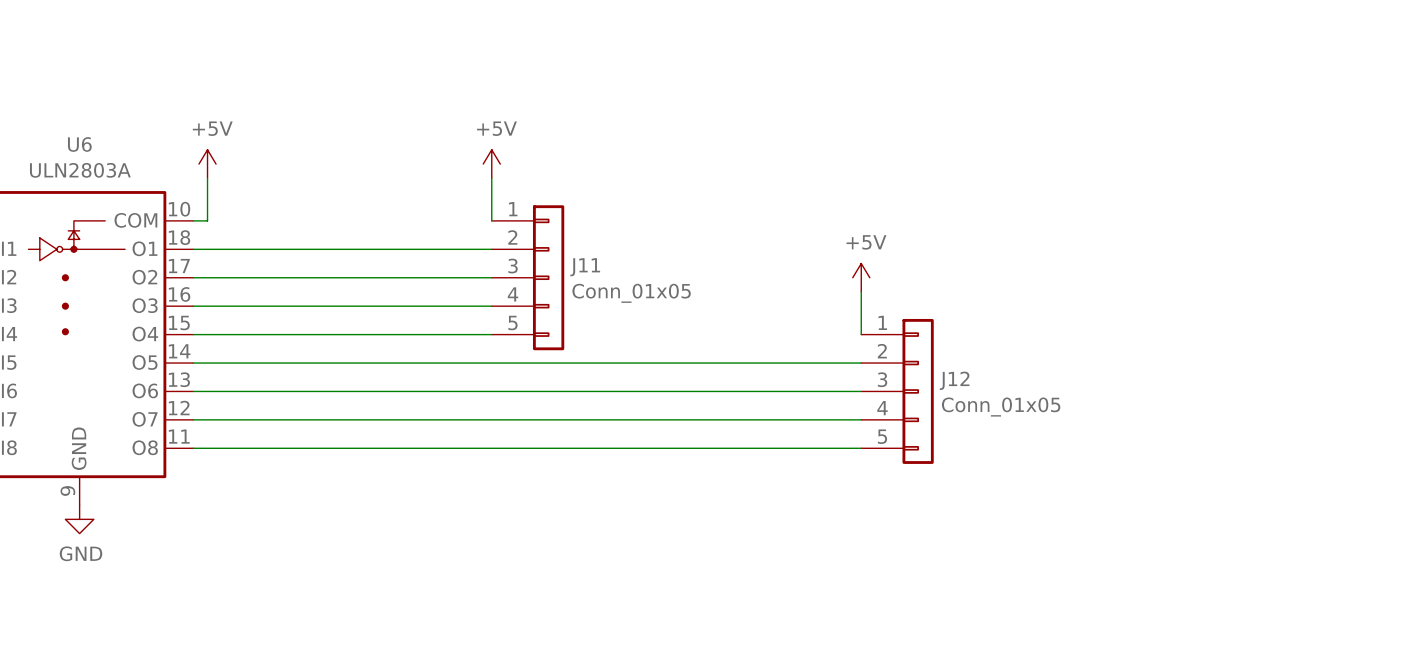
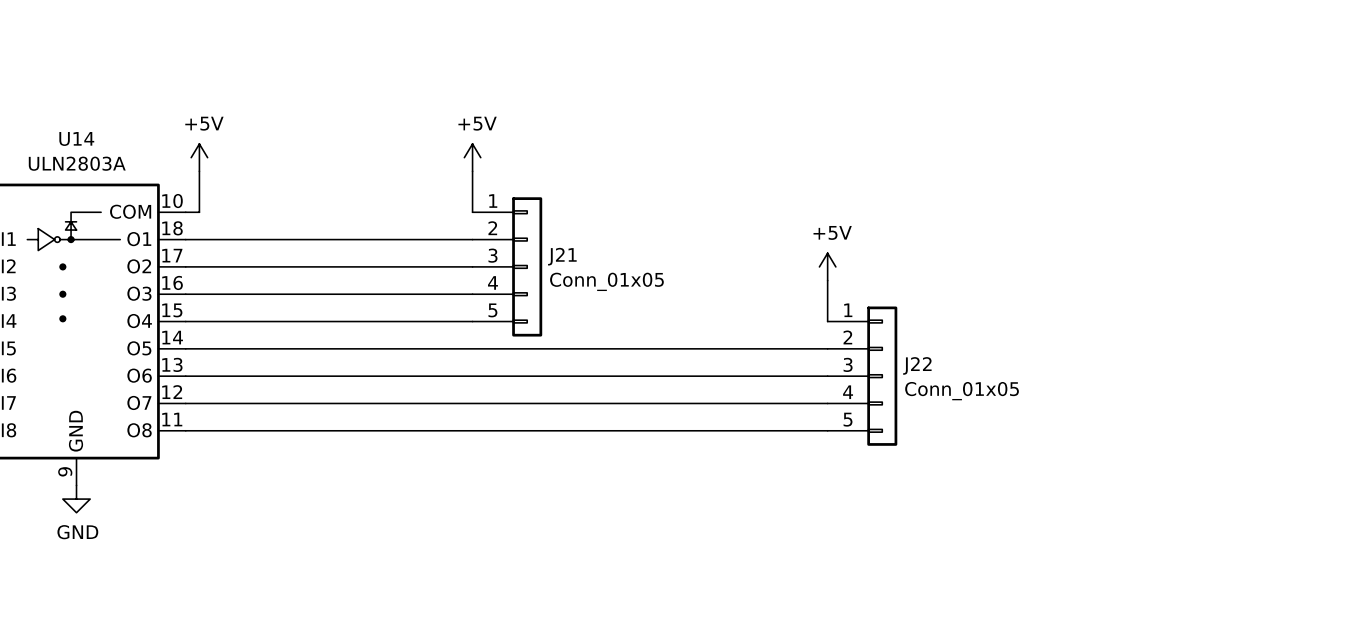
U6 name: U6 (79, 144) -> U14 (76, 138)
J11 name: J11 (585, 267) -> J21 (562, 256)
J12 name: J12 (954, 380) -> J22 (917, 365)

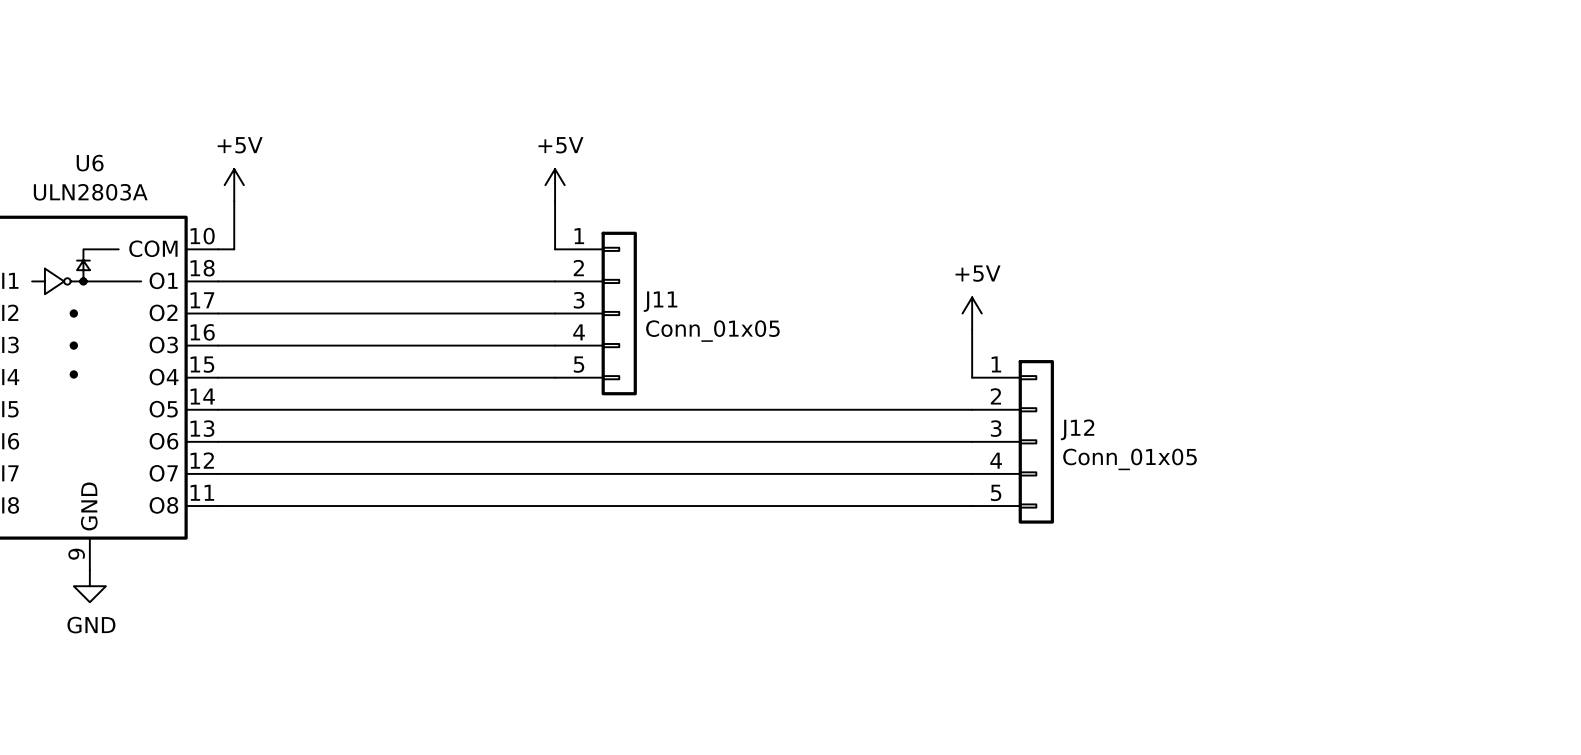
U14 name: U14 (76, 138) -> U6 (90, 163)
J21 name: J21 (562, 256) -> J11 (660, 301)
J22 name: J22 (917, 365) -> J12 (1077, 429)

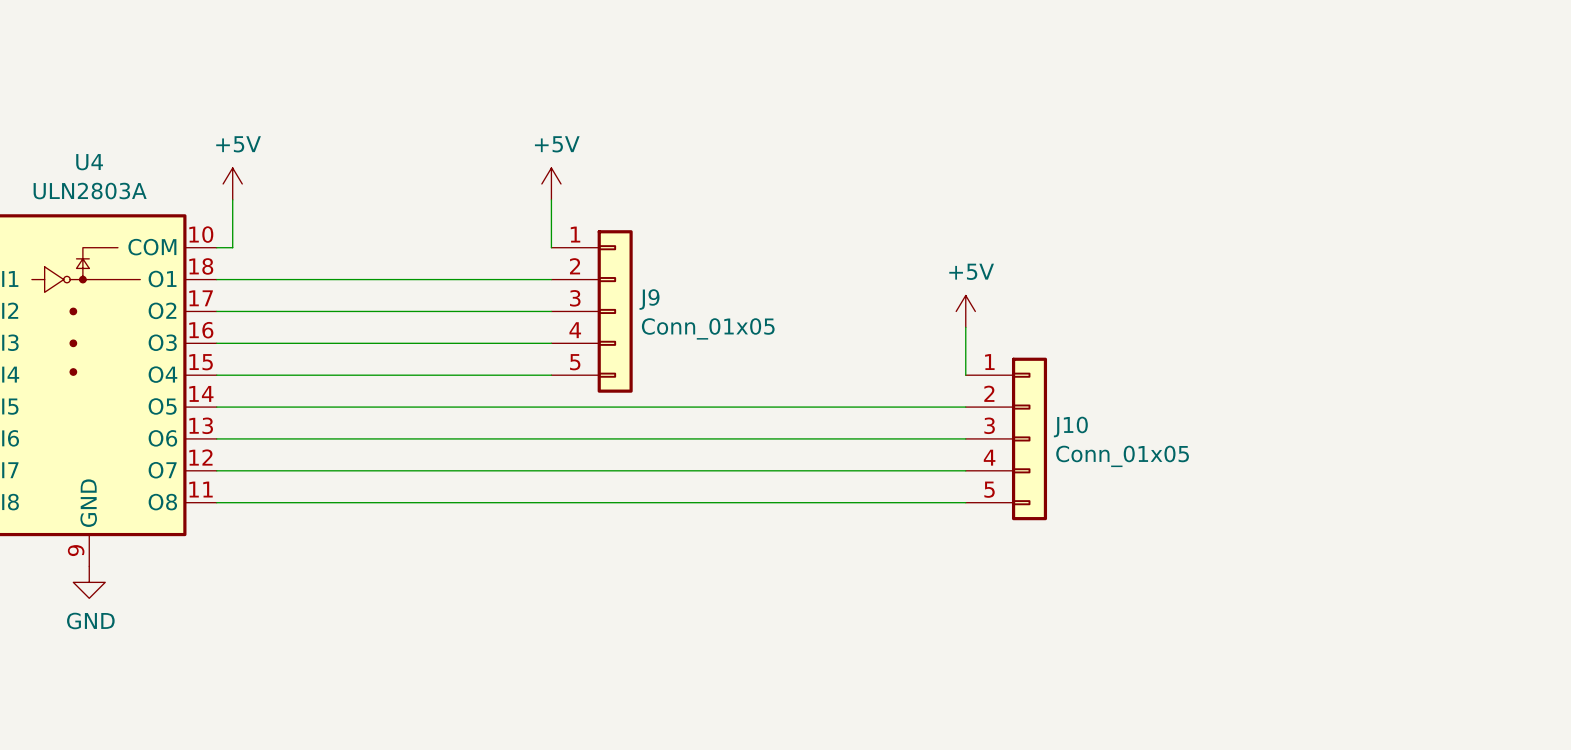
U6 name: U6 (90, 163) -> U4 (89, 162)
J11 name: J11 (660, 301) -> J9 (649, 299)
J12 name: J12 (1077, 429) -> J10 (1070, 427)

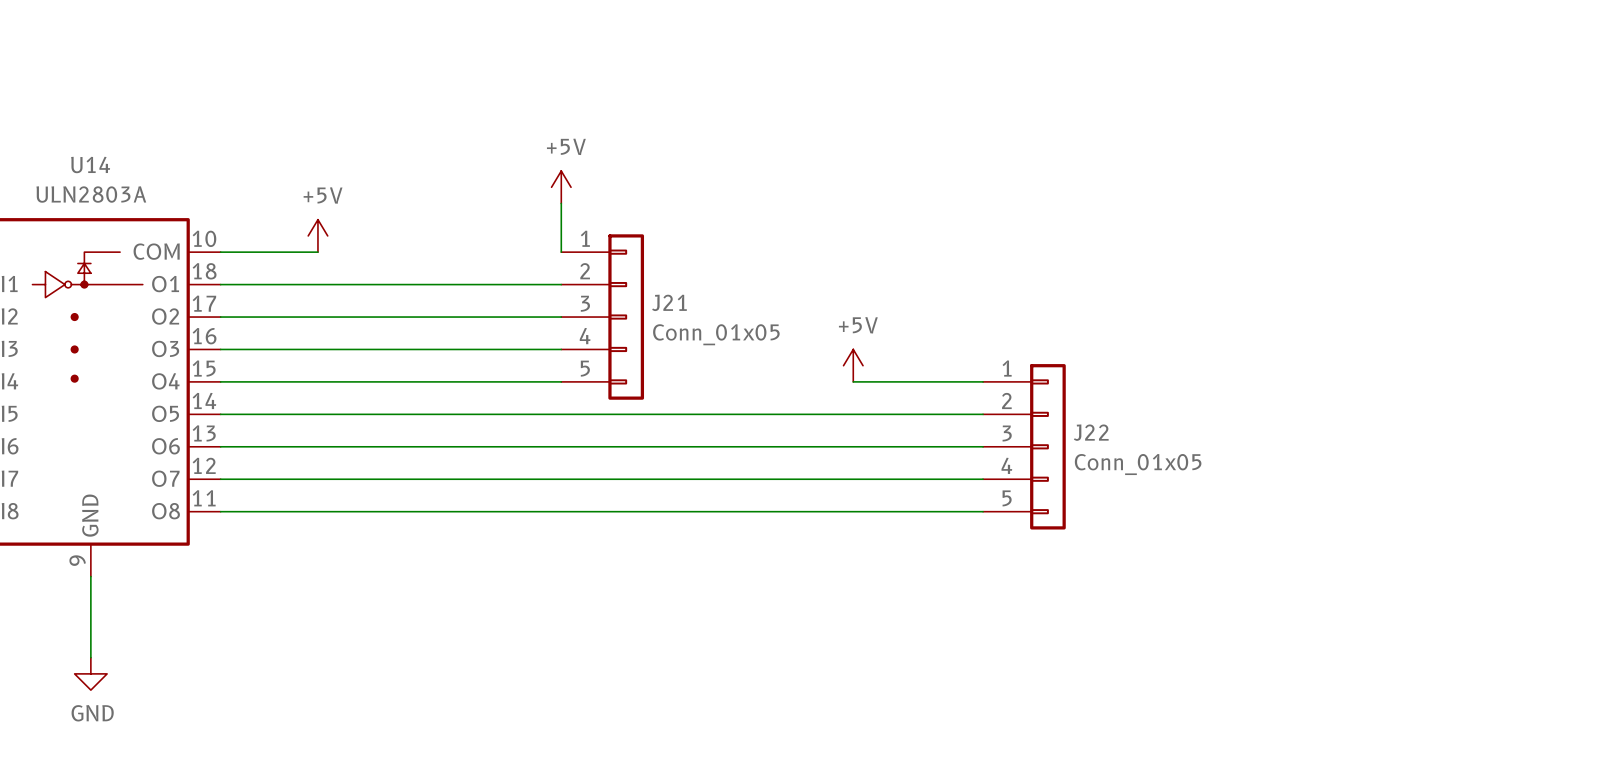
U4 name: U4 (89, 162) -> U14 (90, 165)
power symbol position: +5V (232, 183) -> +5V (317, 235)
wire: (232, 199) (232, 247) -> (317, 252) (236, 252)
J9 name: J9 (649, 299) -> J21 (669, 302)
power symbol position: +5V (965, 311) -> +5V (853, 365)
wire: (965, 327) (965, 375) -> (853, 381) (983, 381)
J10 name: J10 (1070, 427) -> J22 (1091, 432)
wire: none -> (90, 576) (90, 657)
power symbol position: GND (89, 582) -> GND (90, 673)

